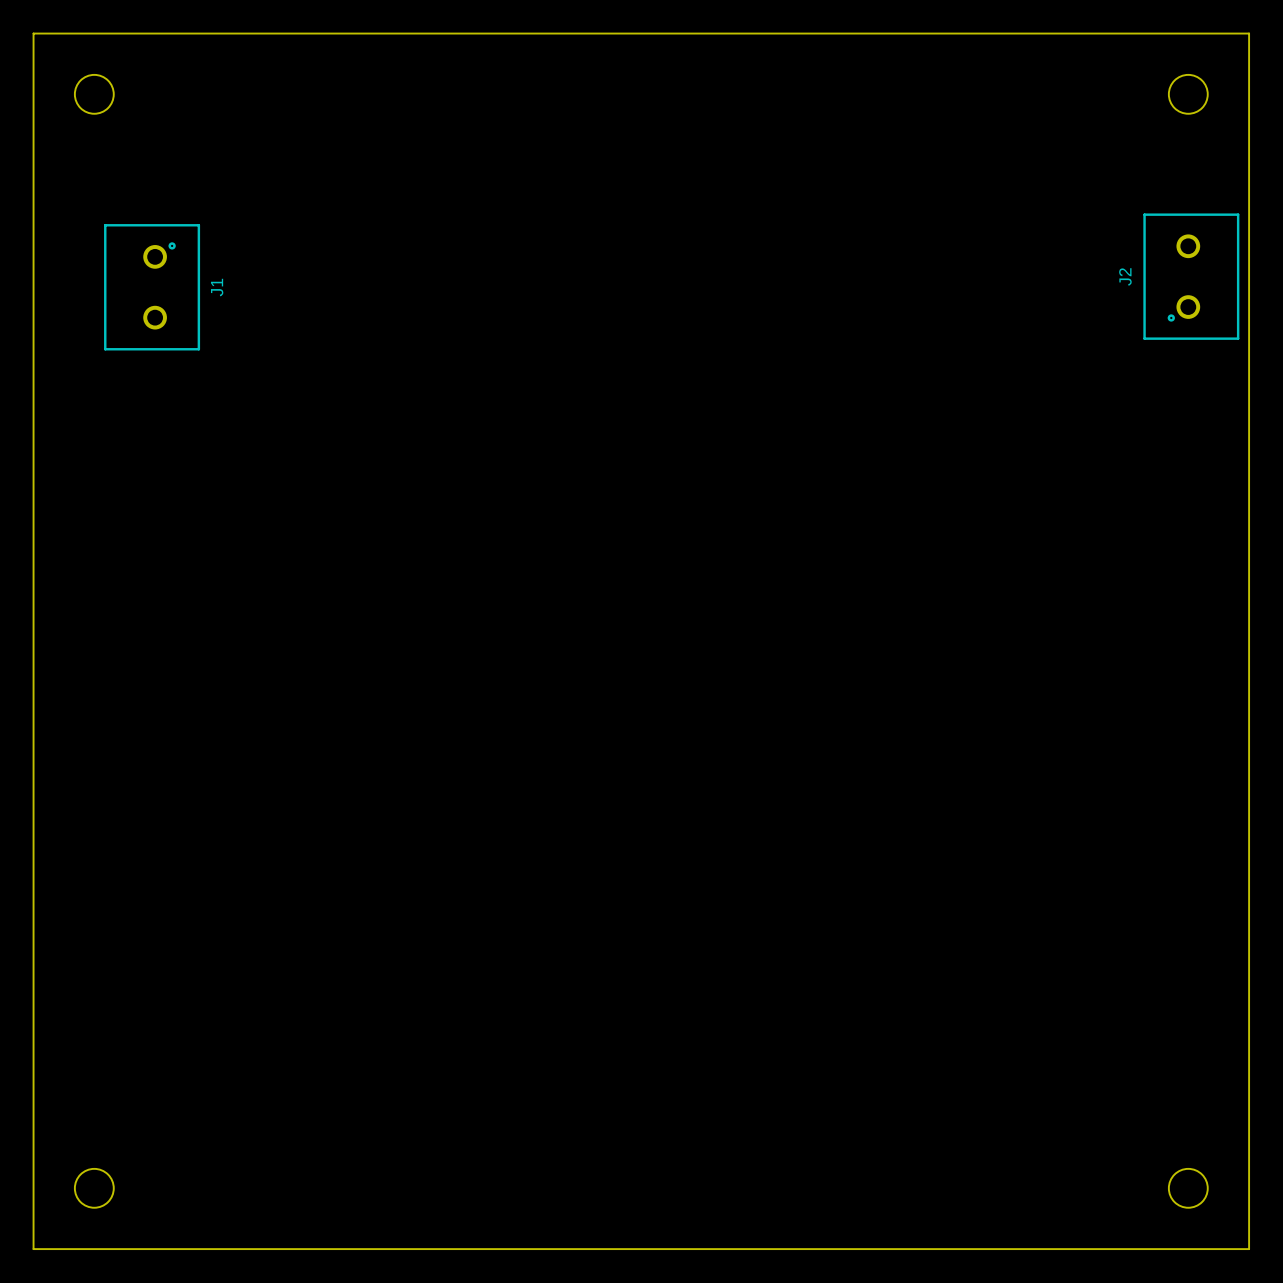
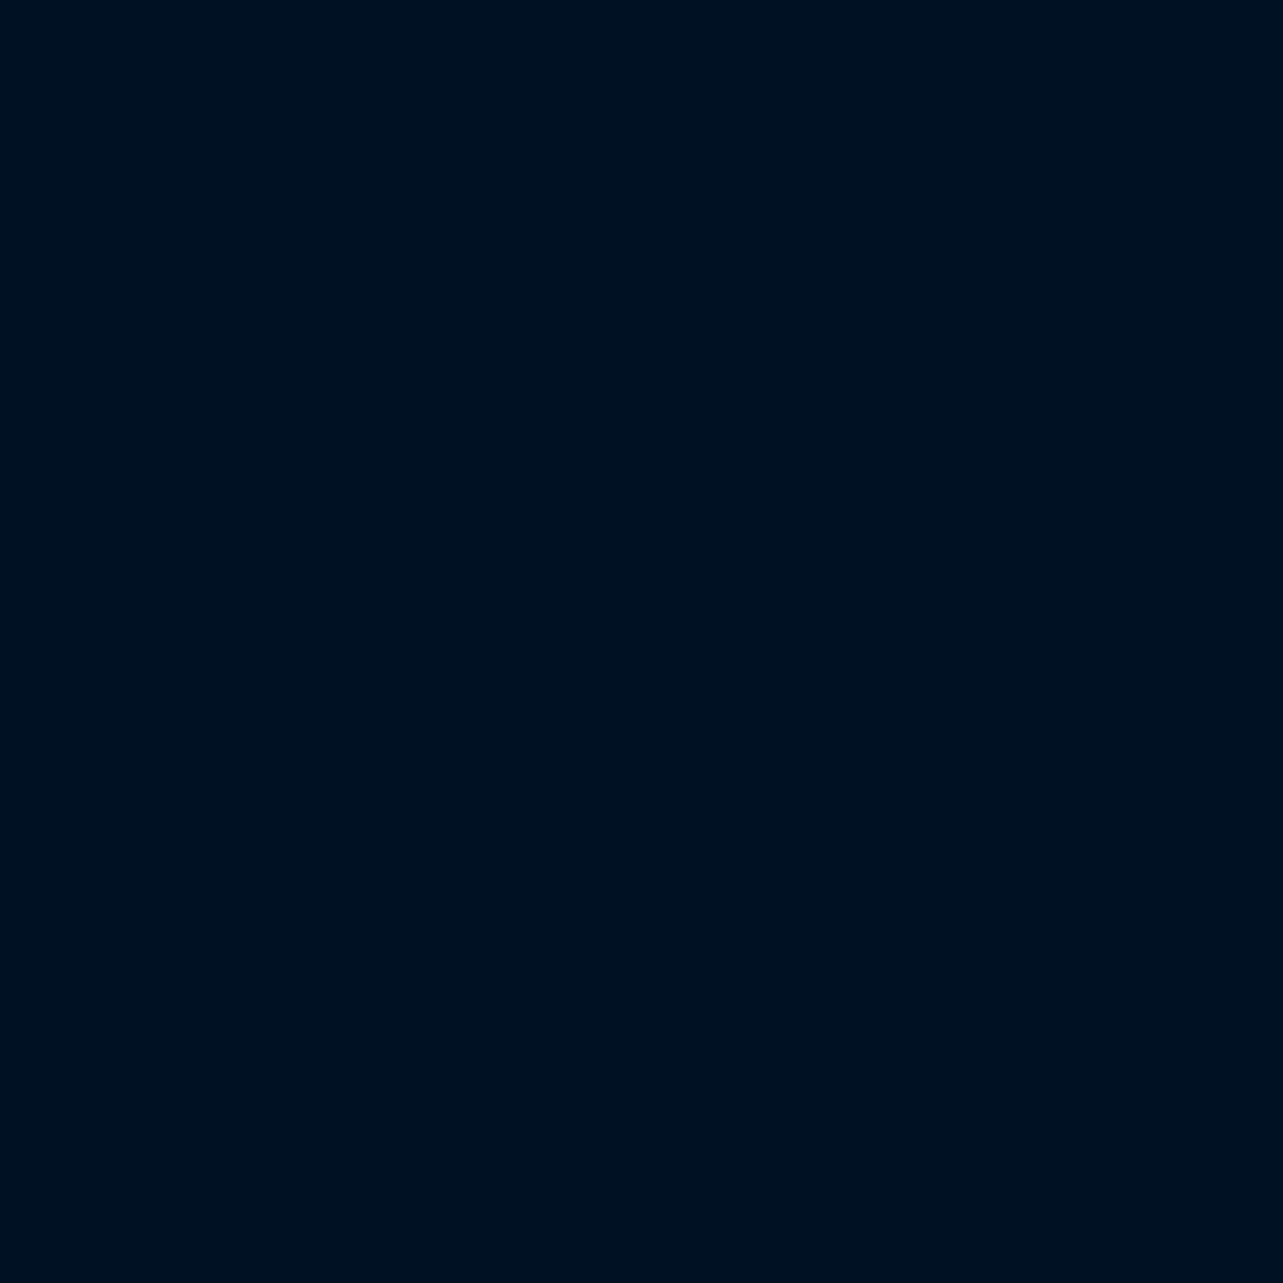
board edge: (33, 33) (1249, 33) (1249, 1249) (33, 1249) (33, 33) -> none
round board edge: [74, 74, 115, 115] -> none
round board edge: [1168, 74, 1209, 115] -> none
J2: (1191, 276) -> none
J1: (152, 287) -> none
round board edge: [74, 1168, 115, 1209] -> none
round board edge: [1168, 1168, 1209, 1209] -> none

